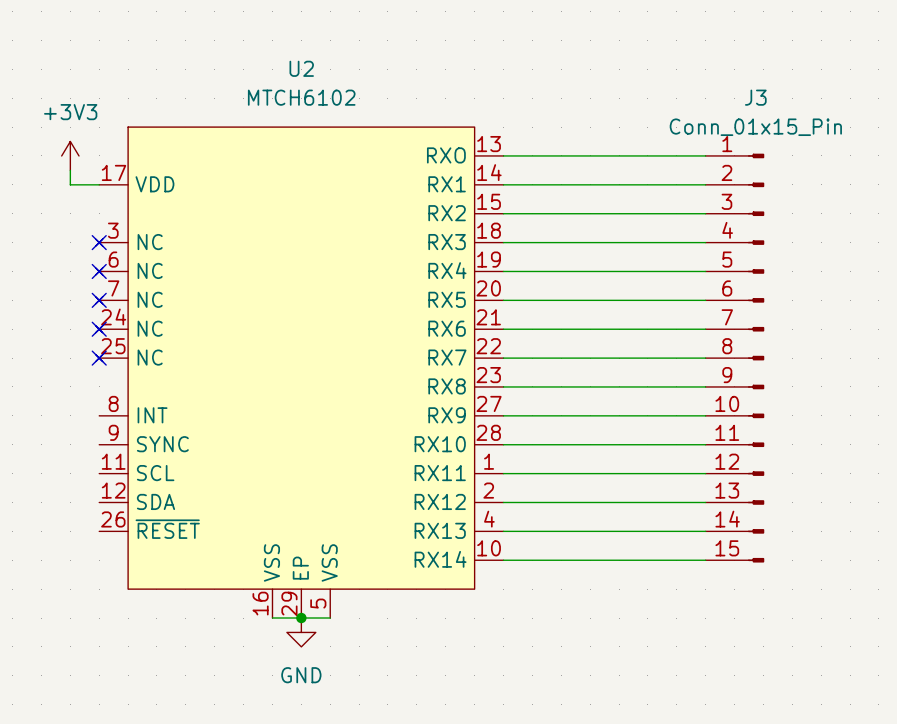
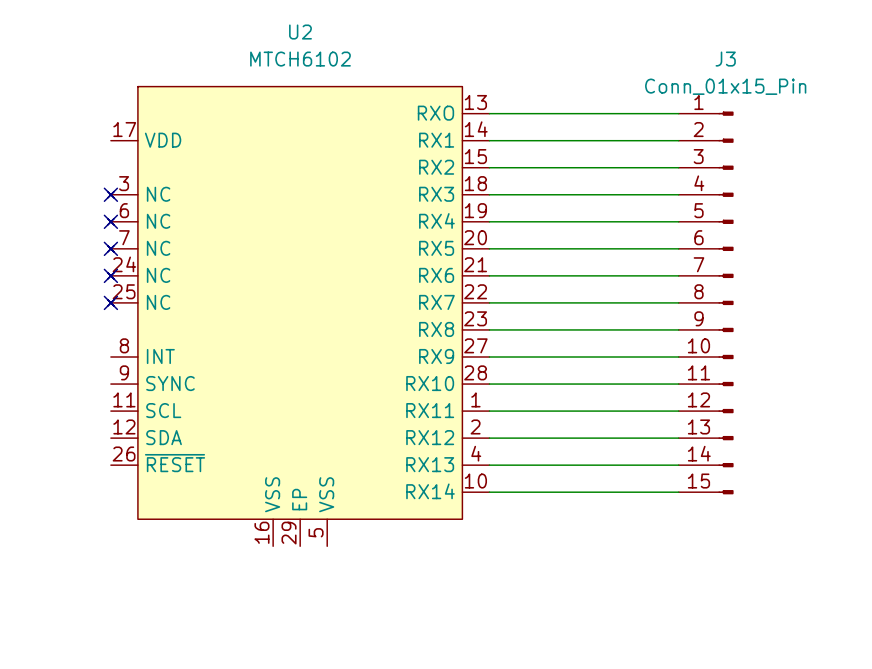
power symbol: +3V3 (70, 155) -> none
wire: (70, 170) (70, 184) (99, 184) -> none
wire: (272, 618) (330, 618) -> none
junction: (301, 618) -> none
power symbol: GND (301, 632) -> none

